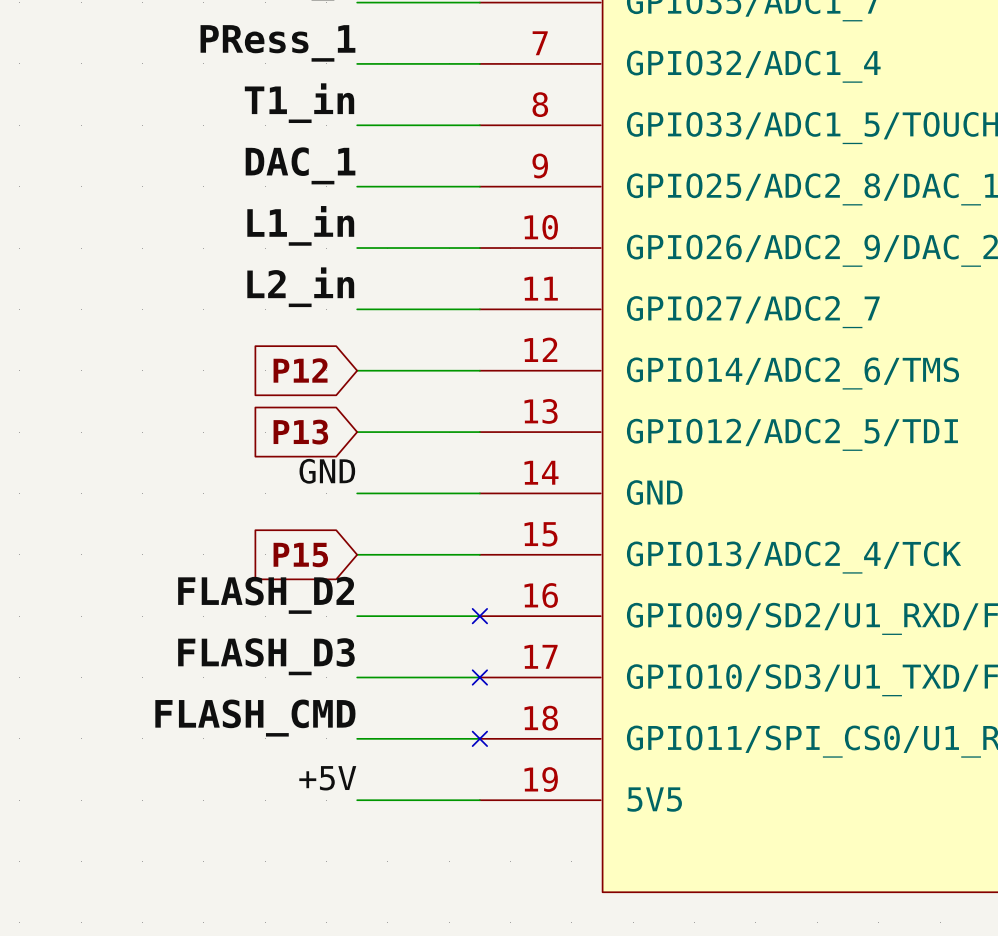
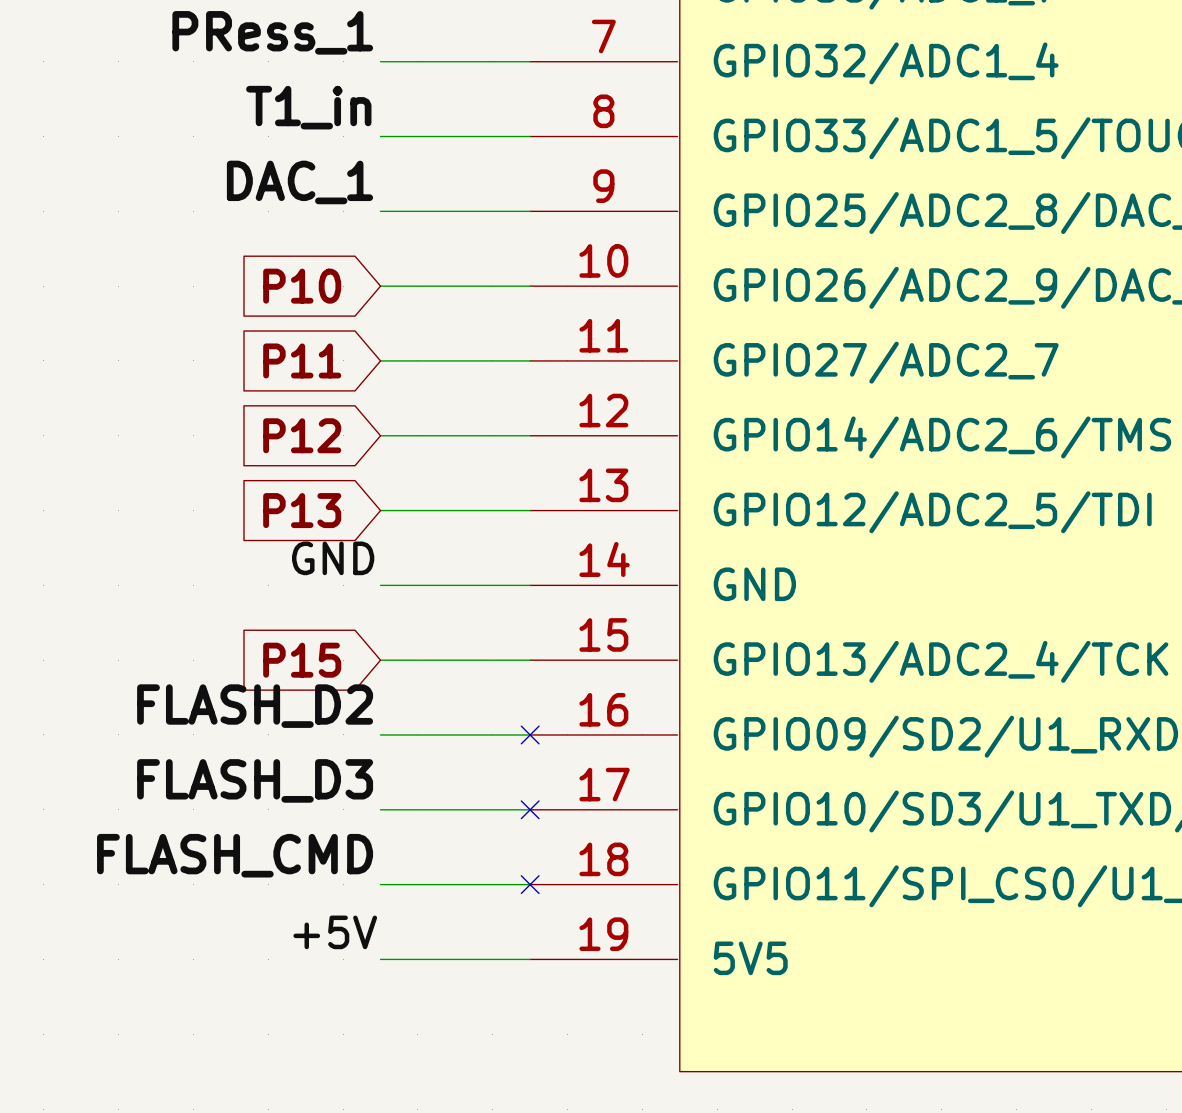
label: L1_in (300, 225) -> none
global label: none -> P10 (302, 286)
label: L2_in (300, 287) -> none
global label: none -> P11 (302, 360)

